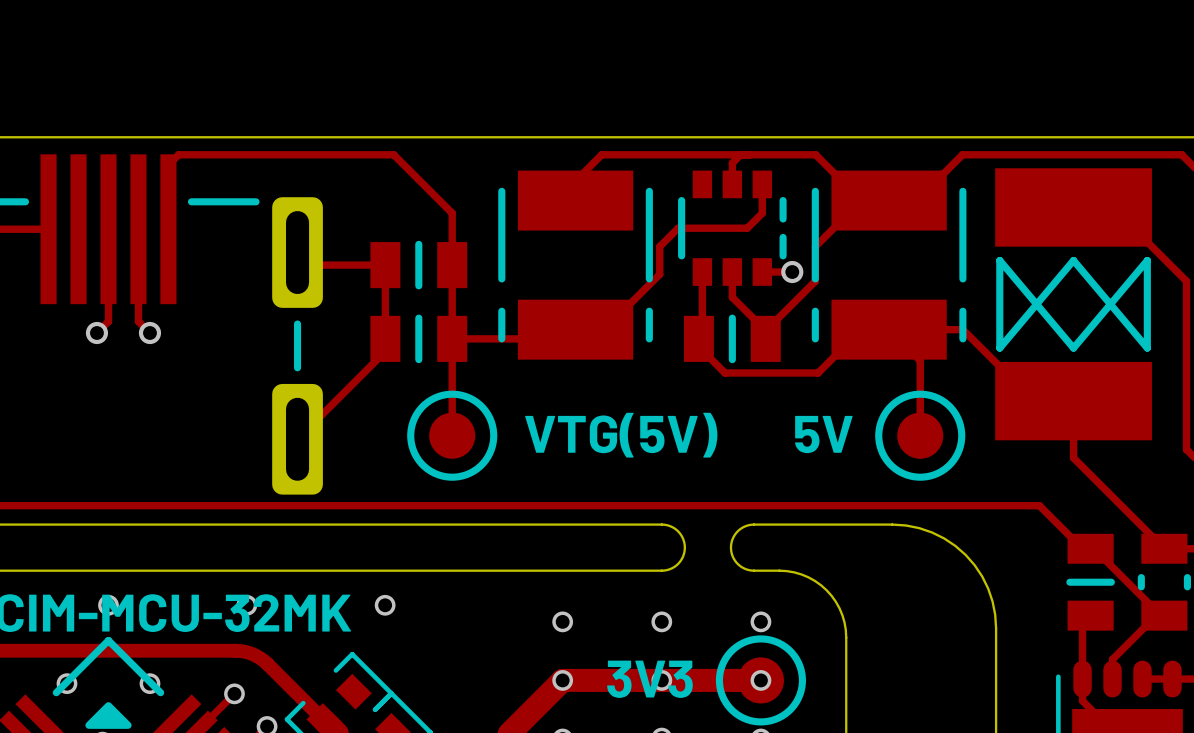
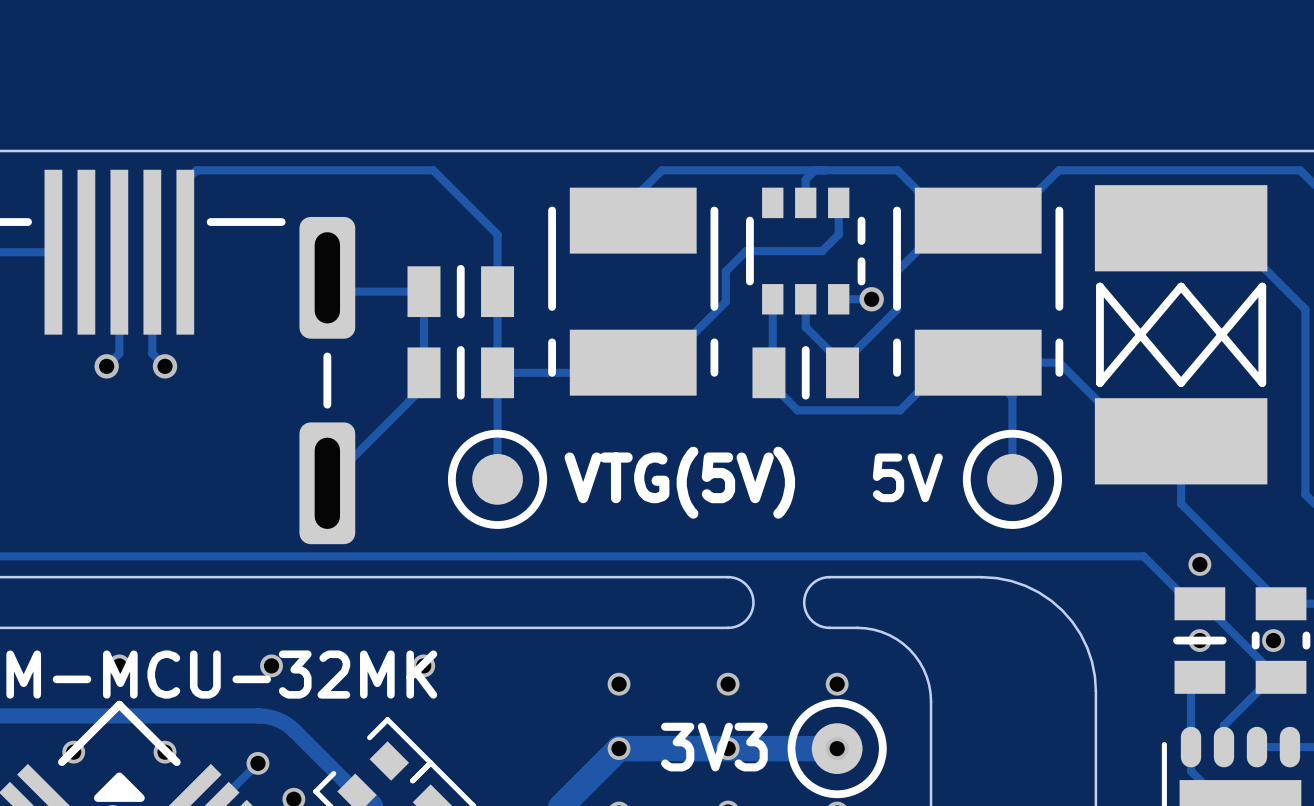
via: none -> (1199, 564)
via: none -> (1199, 640)
via: none -> (1273, 640)

